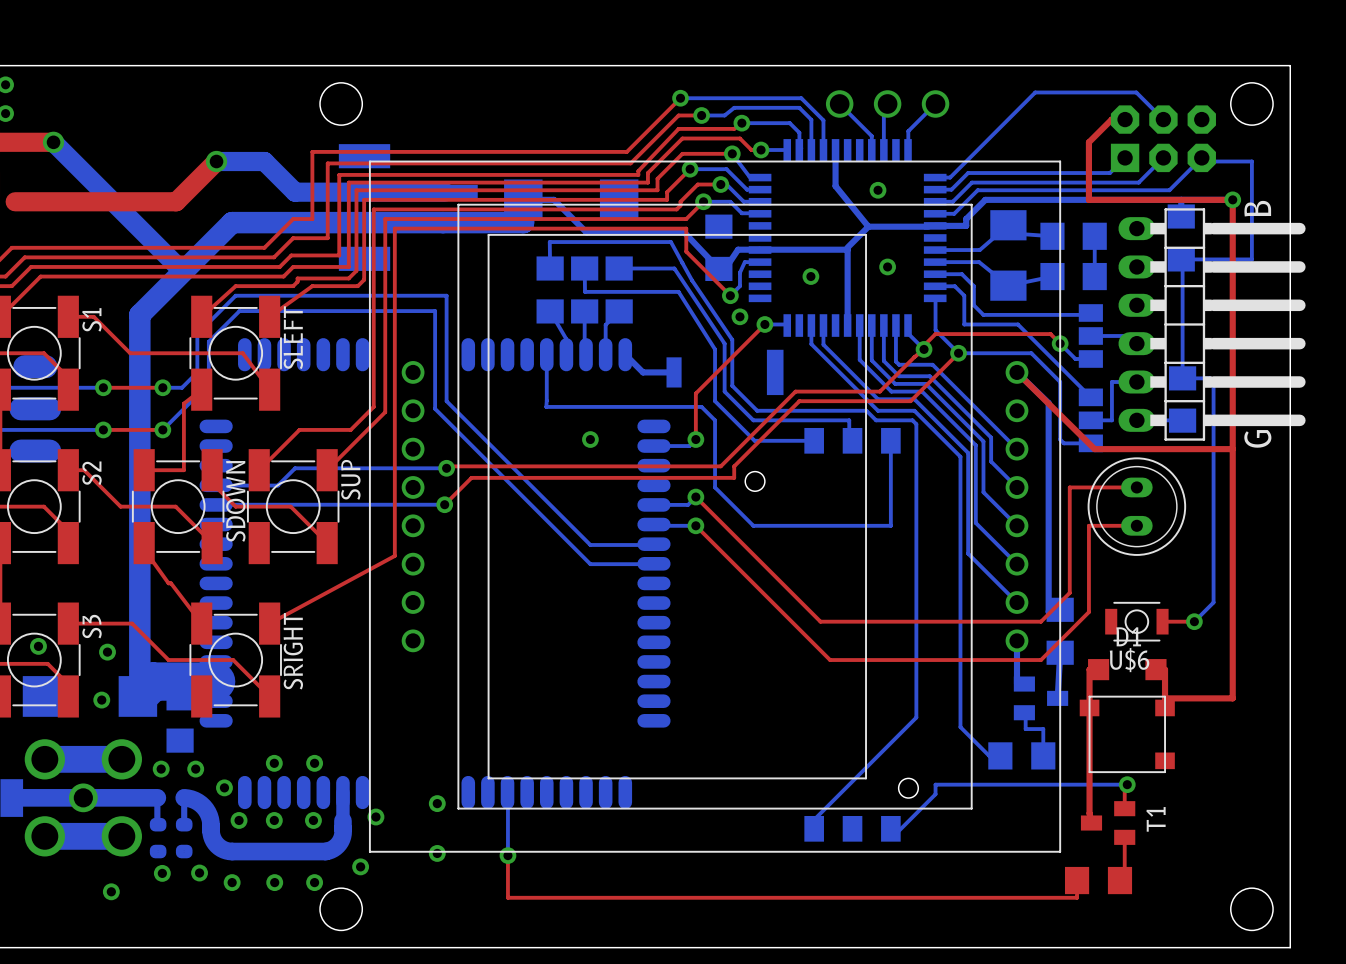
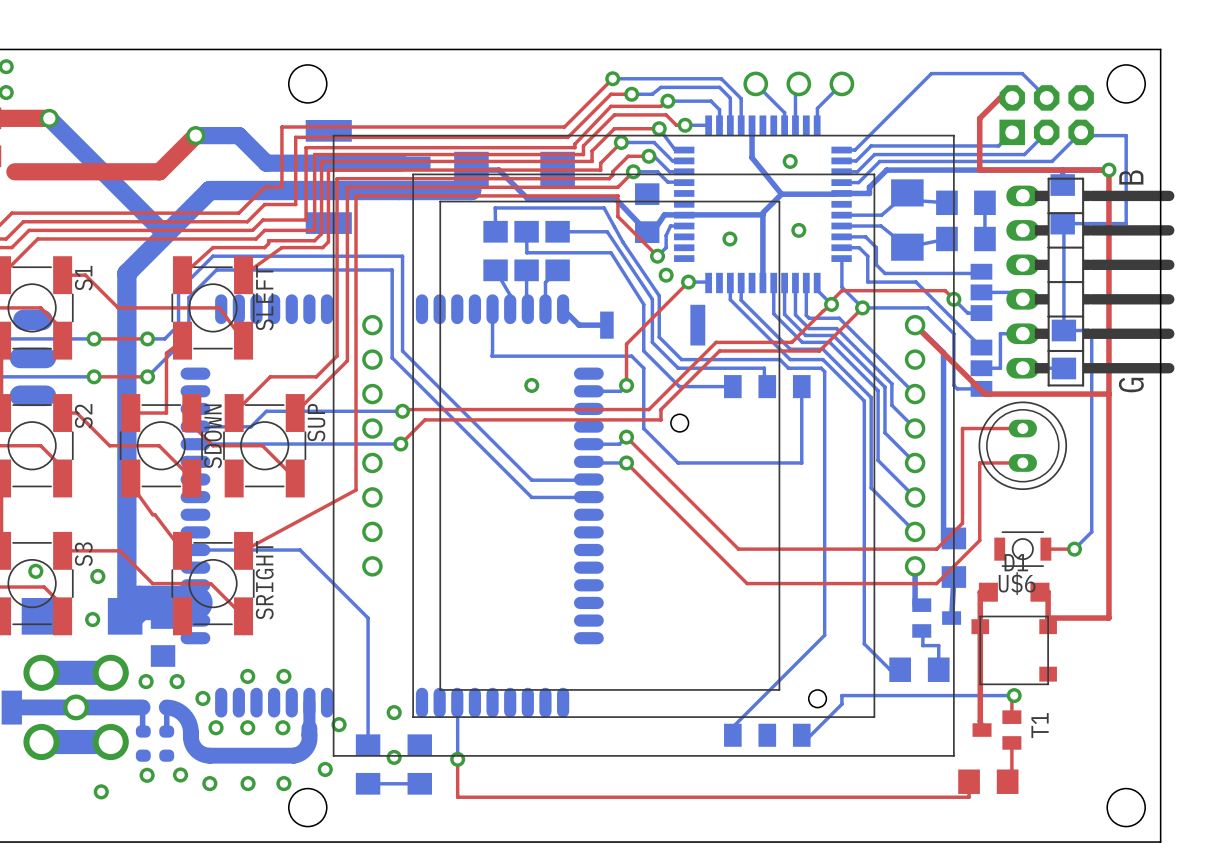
bottom track: none -> (195, 550) (300, 550) (368, 618) (368, 745)
part: none -> (368, 764)
part: none -> (419, 764)
bottom track: none -> (368, 783) (419, 783)

